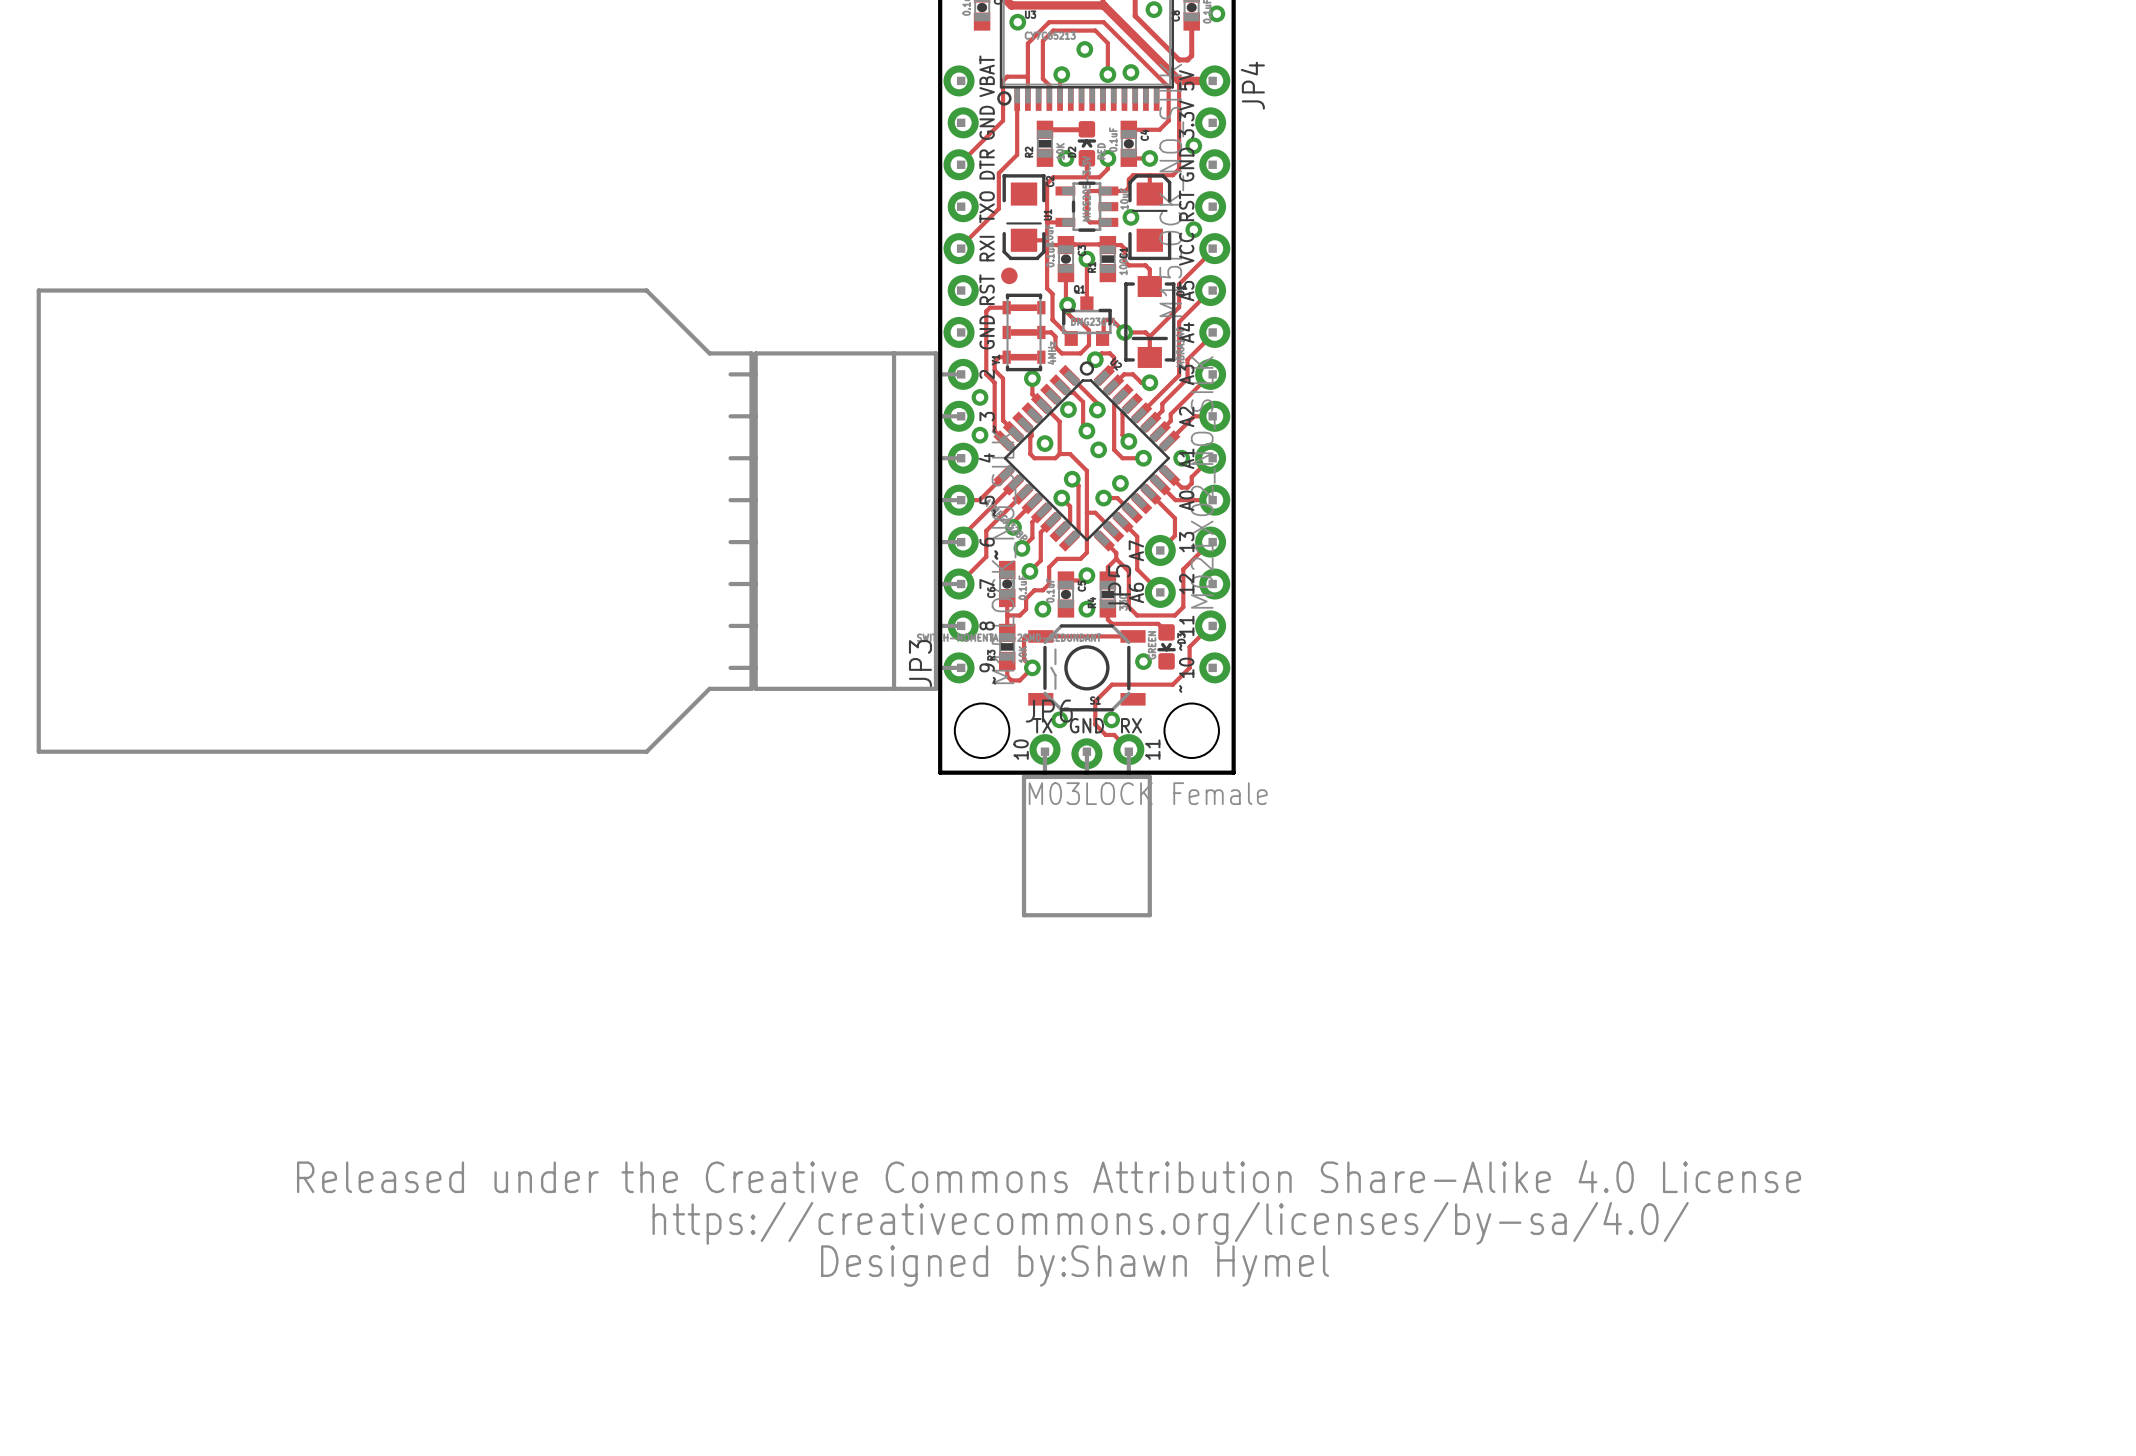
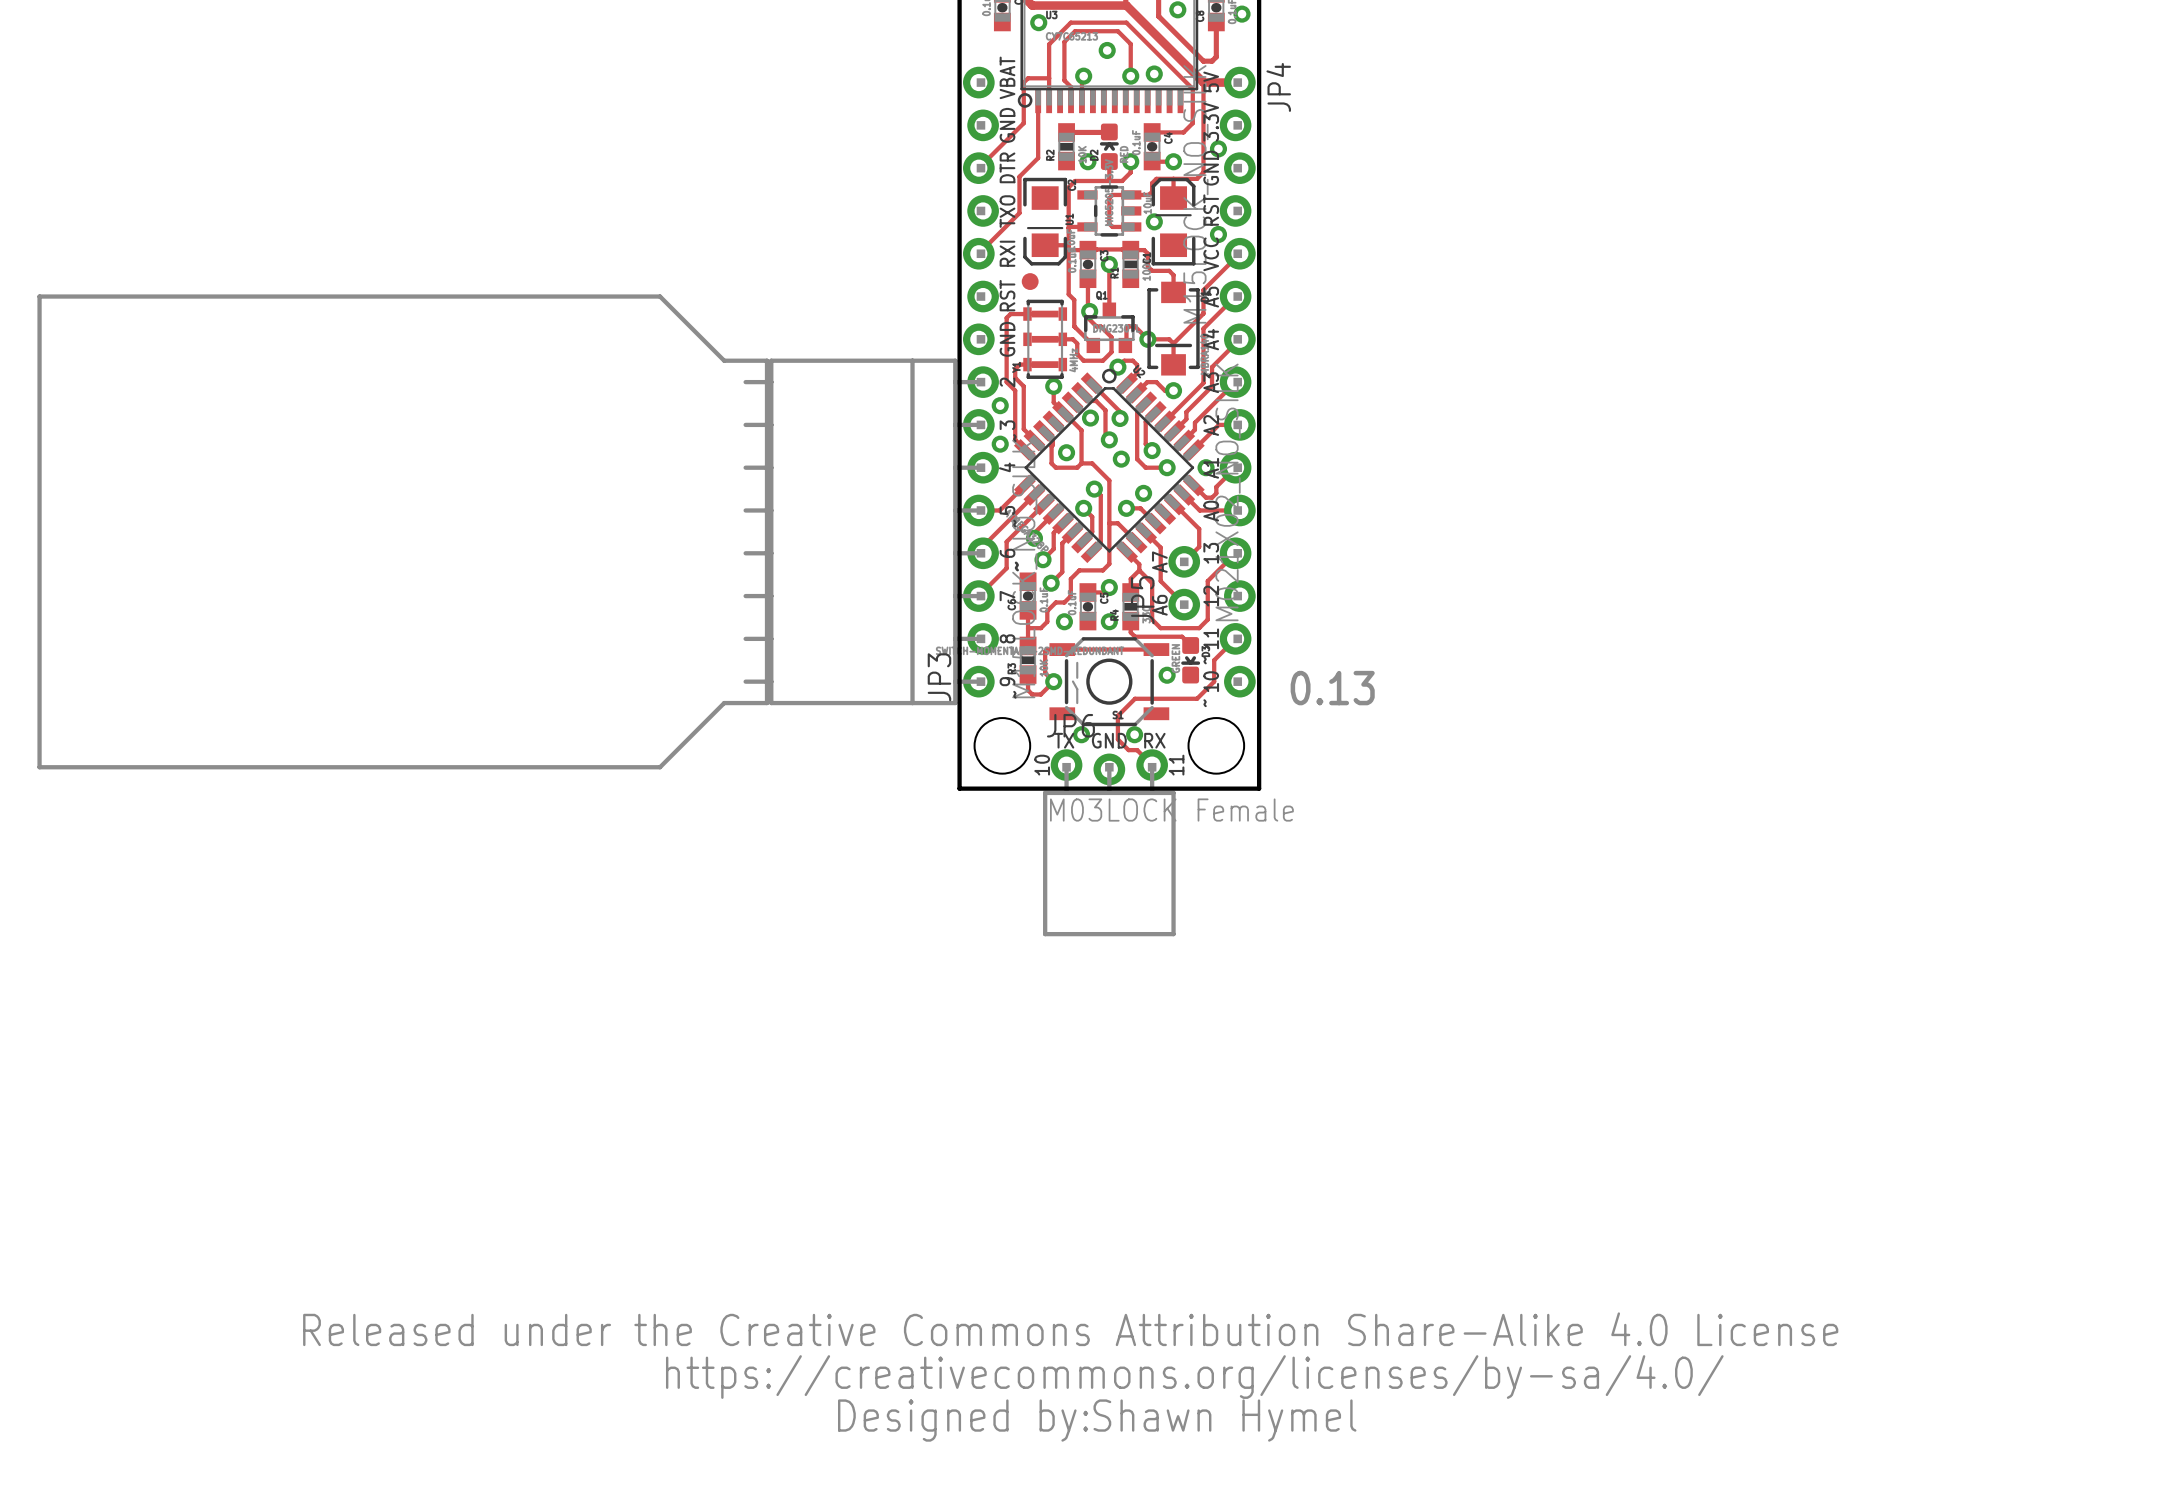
text: none -> 0.13 (1332, 688)
drawing position: (1049, 1223) -> (1070, 1377)

